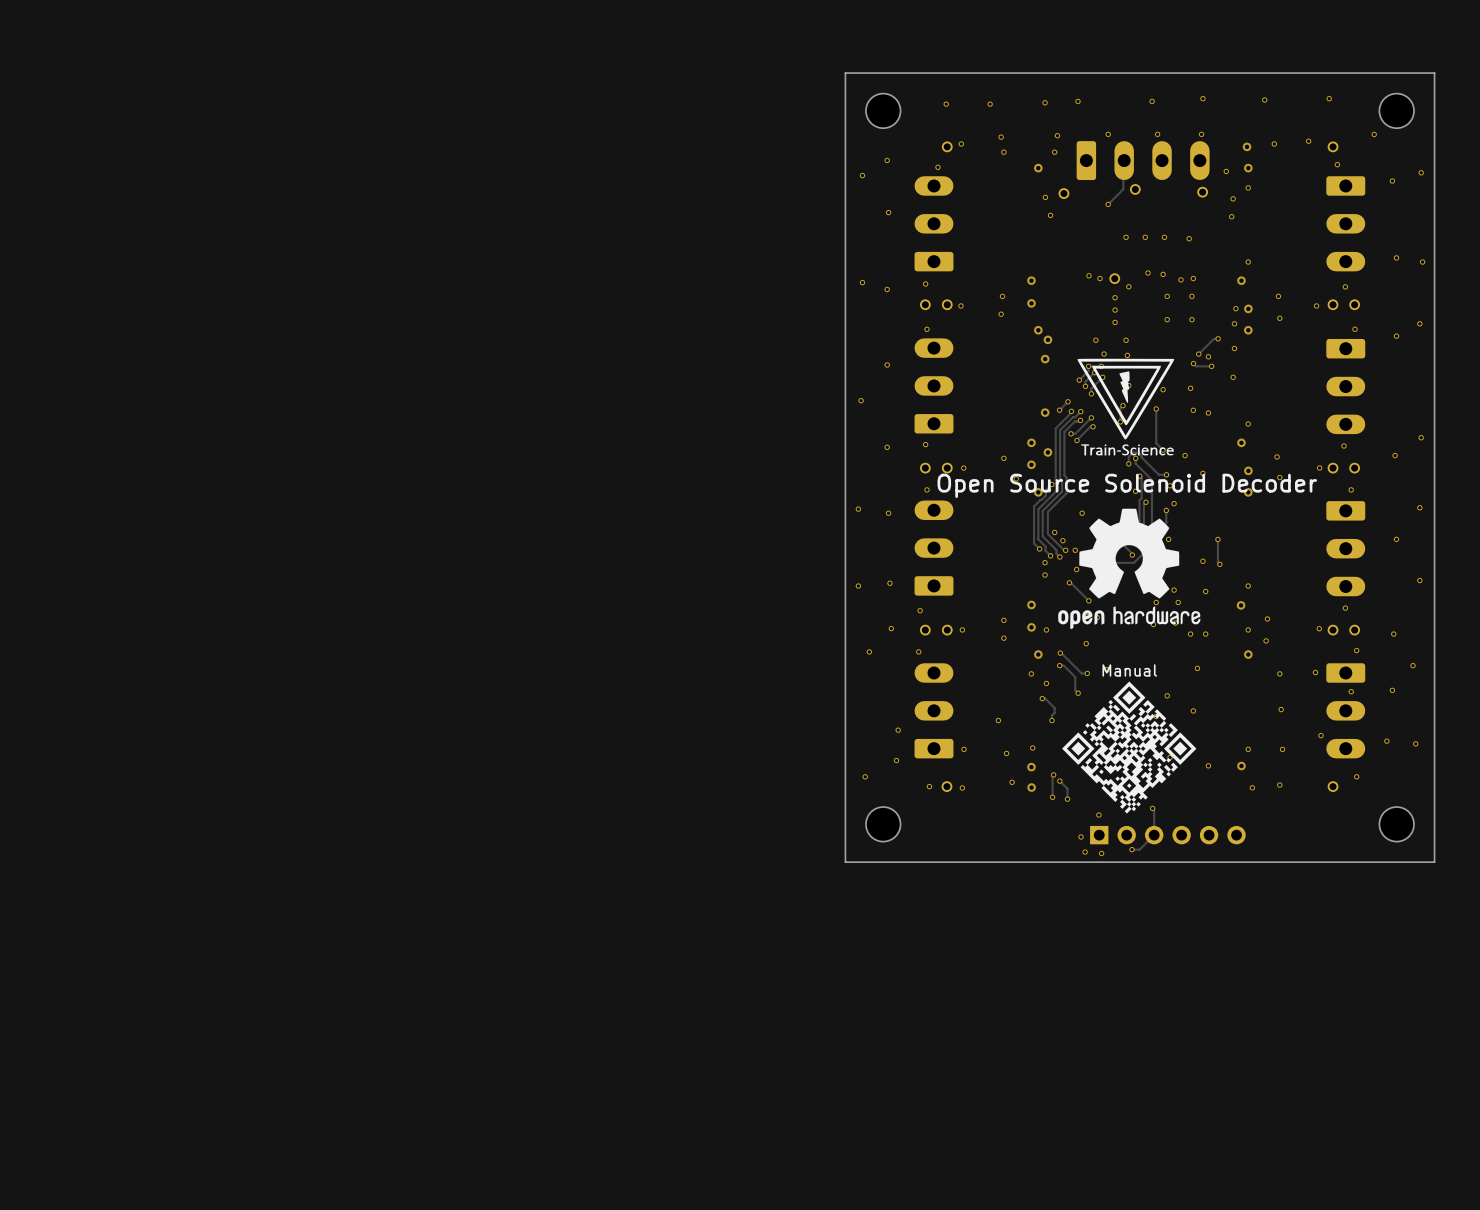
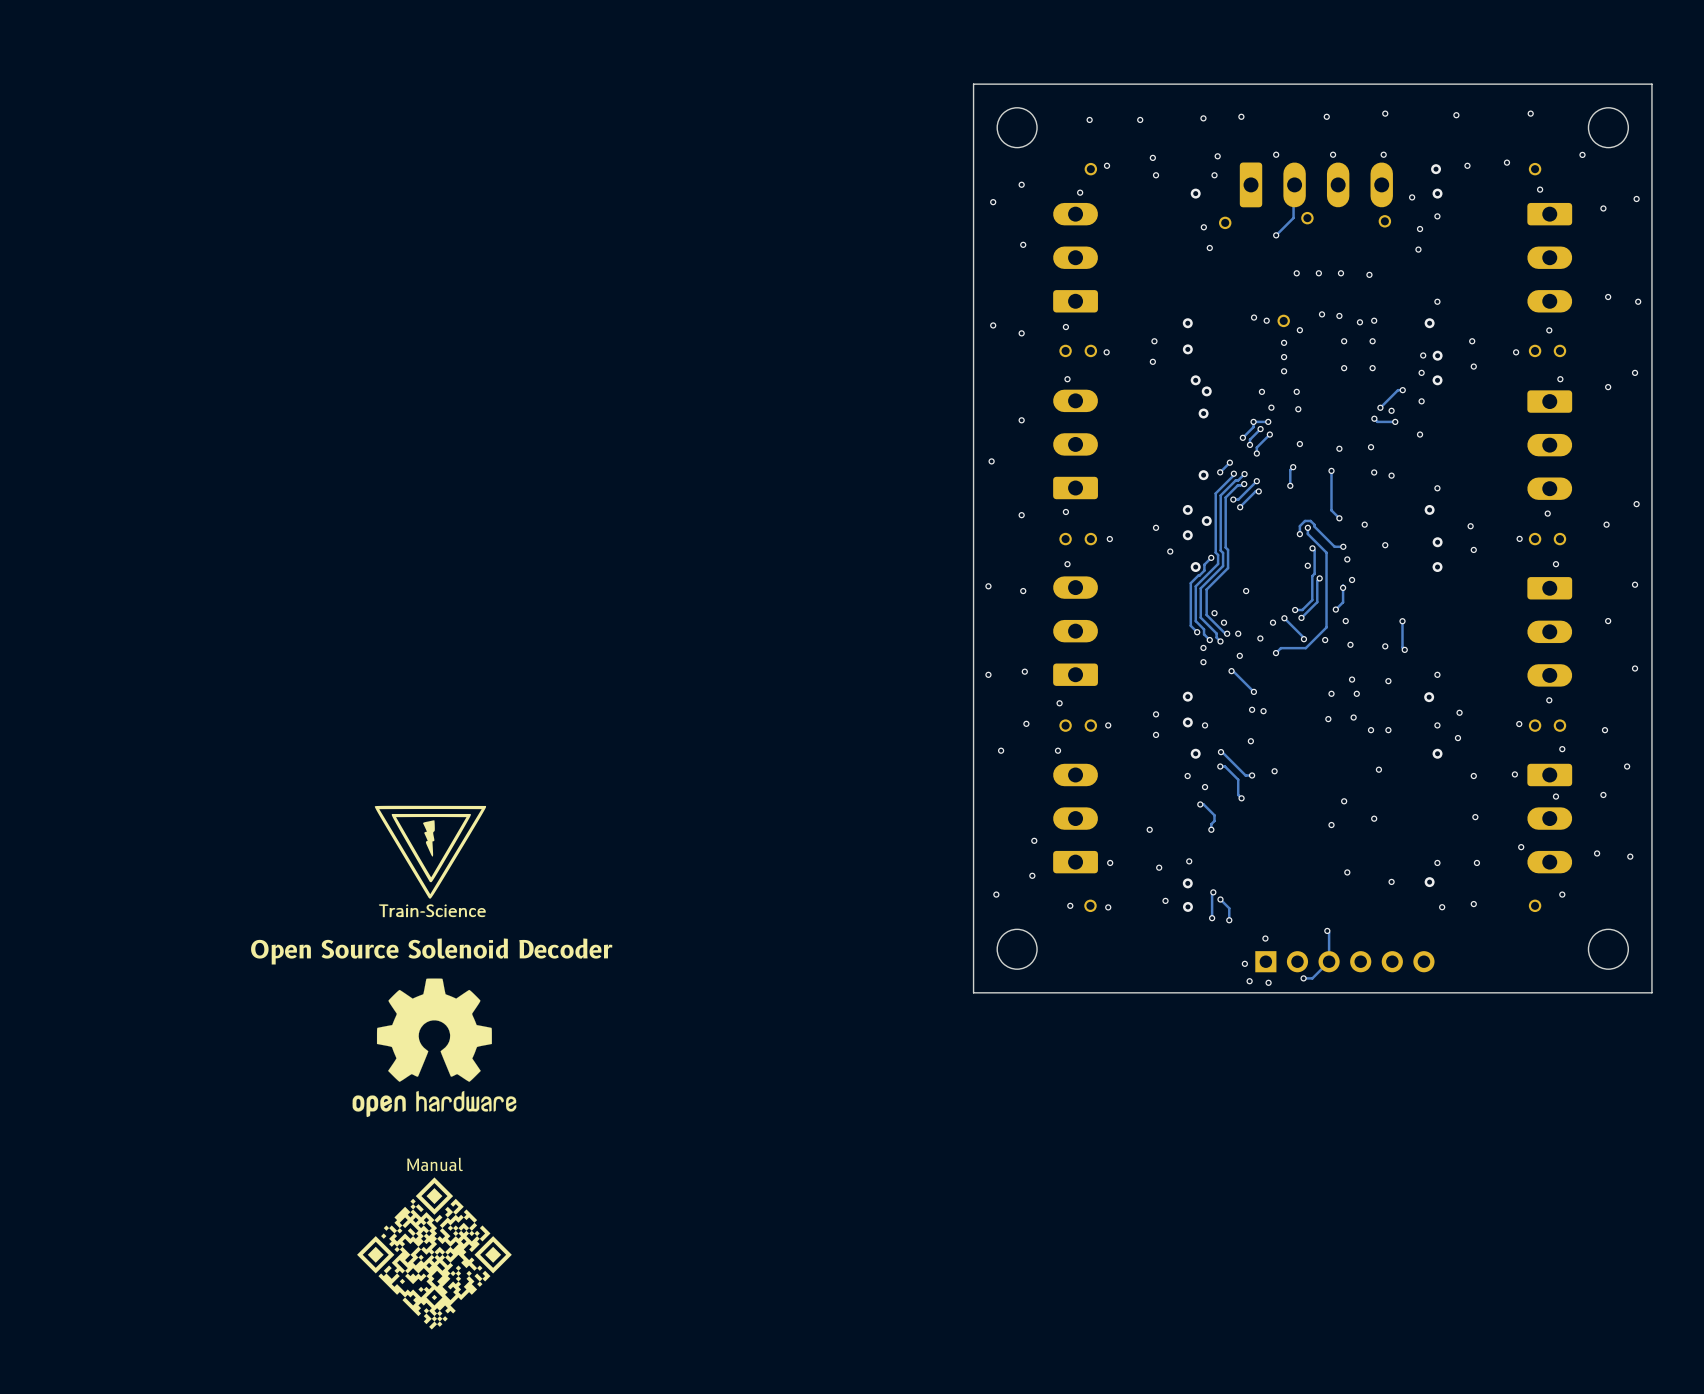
drawing: [1077, 358, 1175, 456] -> none
text: Open Source Solenoid Decoder (1127, 485) -> none
drawing: [1058, 508, 1201, 630] -> none
text: Manual (1129, 670) -> none
drawing: [1062, 681, 1197, 814] -> none
drawing: none -> [374, 805, 487, 918]
text: none -> Open Source Solenoid Decoder (431, 951)
drawing: none -> [352, 978, 517, 1118]
text: none -> Manual (435, 1164)
drawing: none -> [357, 1177, 512, 1330]

